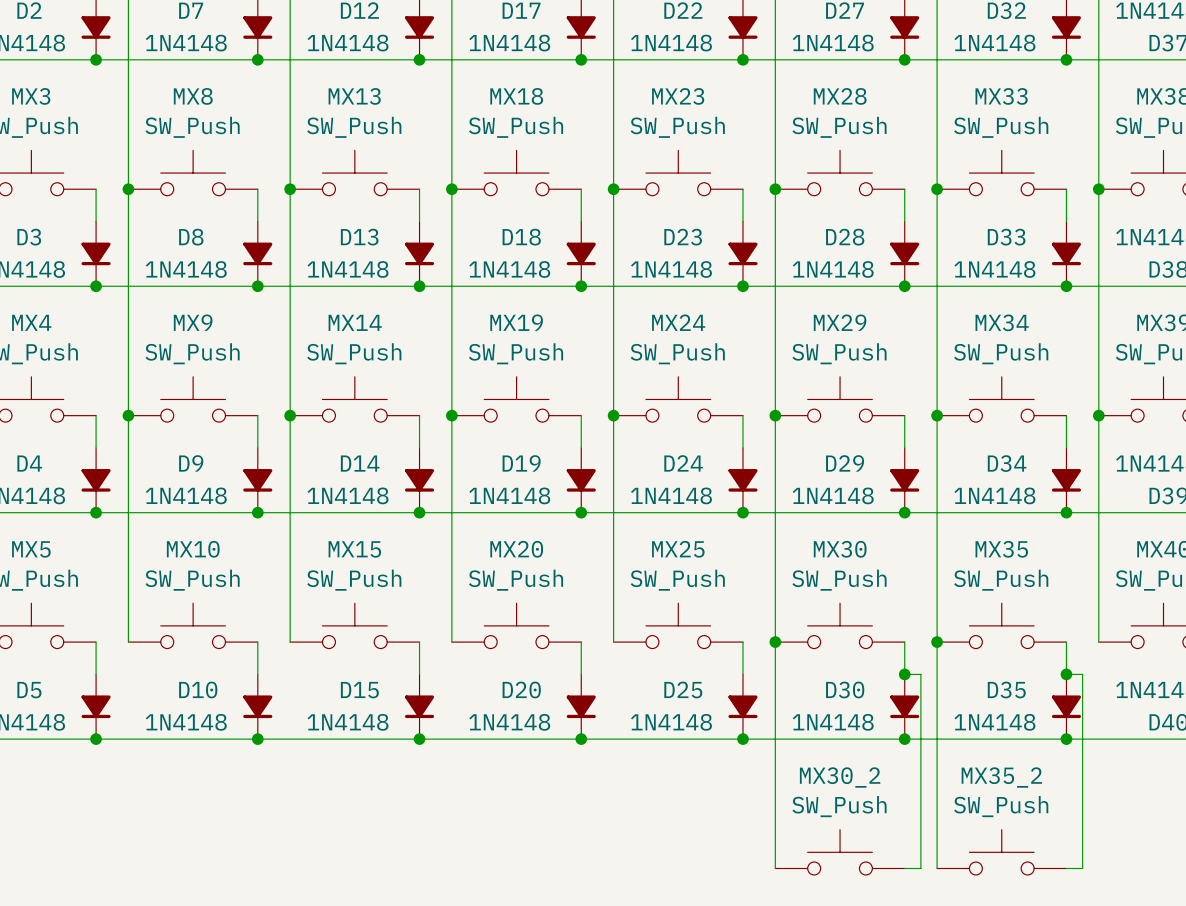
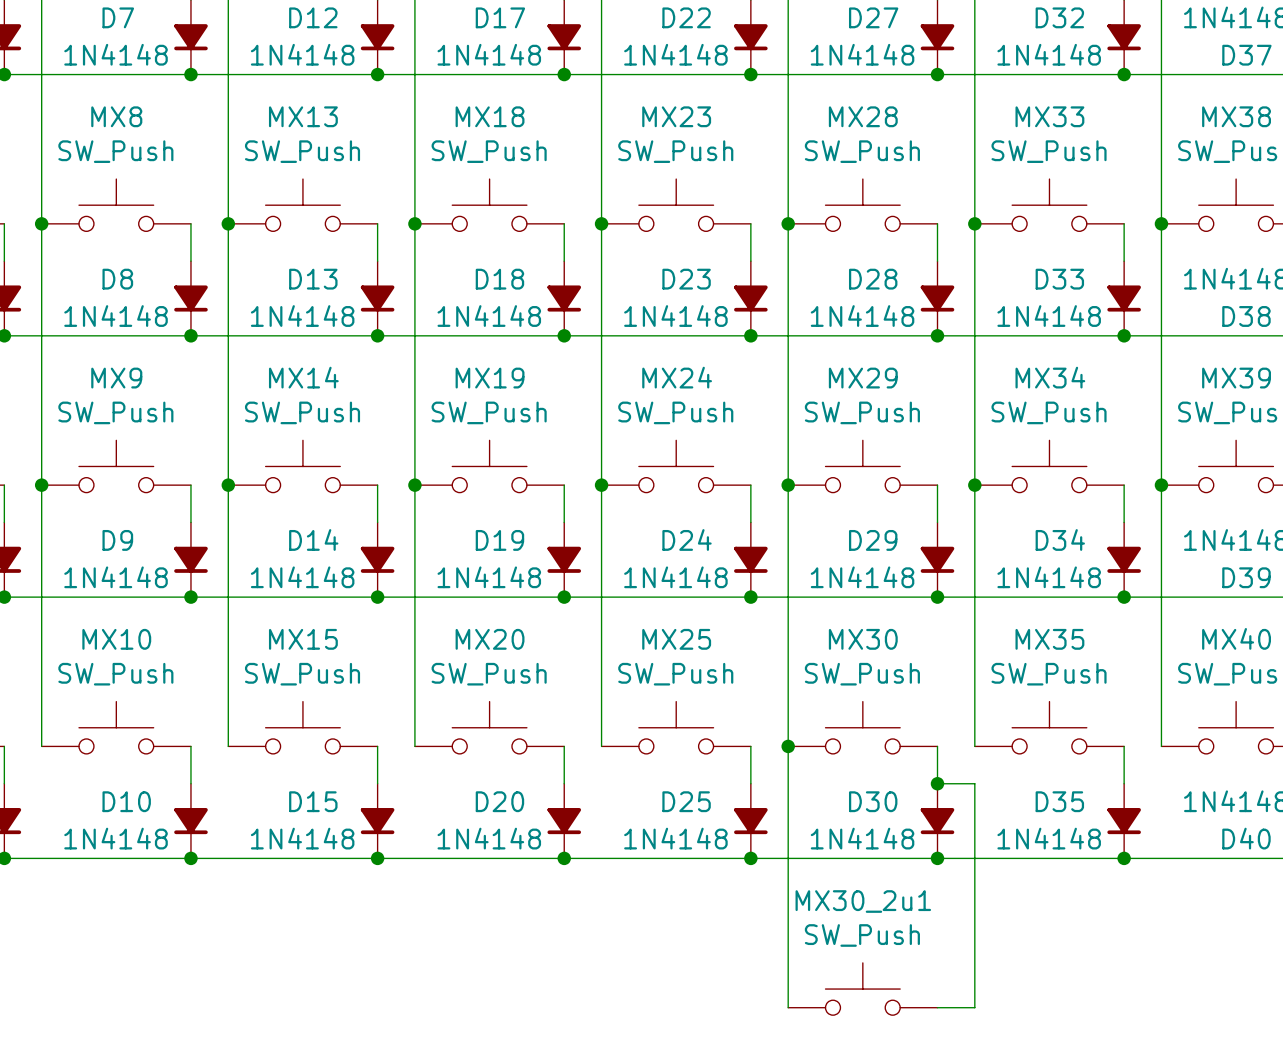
wire: (937, 642) (937, 674) -> (956, 783) (974, 783)
junction: (937, 642) -> none
wire: (920, 674) (920, 868) -> (974, 1007) (956, 1007)
wire: (1066, 674) (1082, 674) (1082, 868) (1066, 868) -> none
junction: (1066, 674) -> none
MX30_2 name: MX30_2 (840, 777) -> MX30_2u1 (863, 901)
MX35_2: SW_Push (1001, 852) -> none

